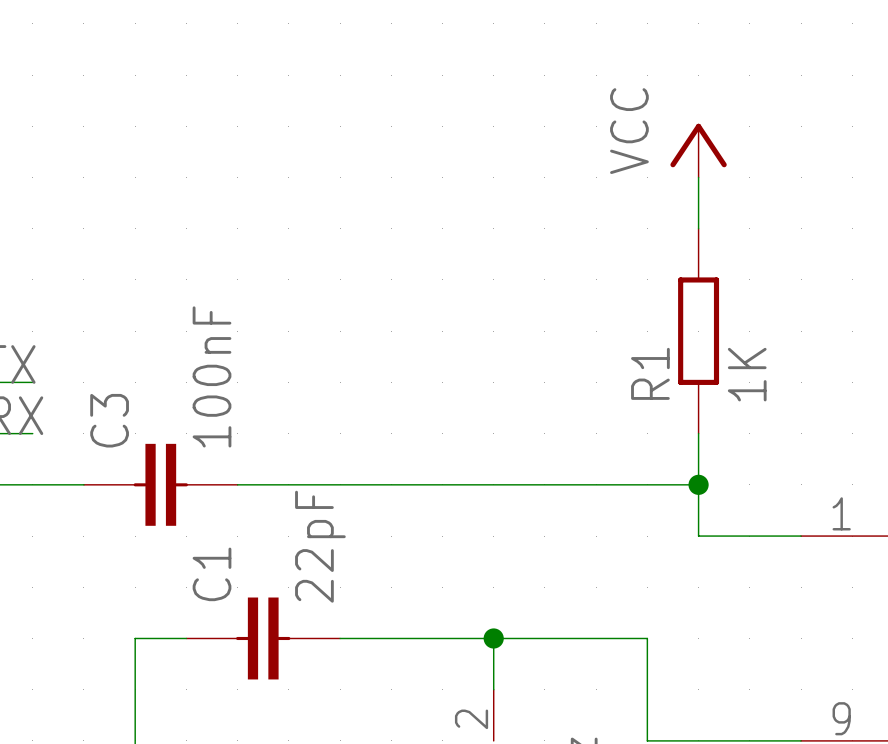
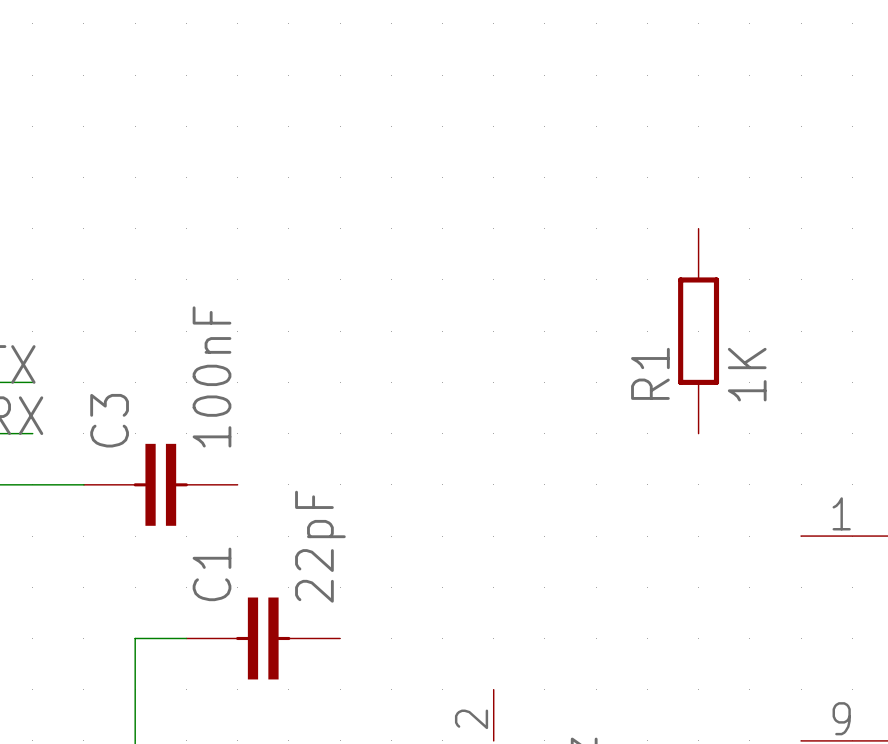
power symbol: VCC (698, 150) -> none
wire: (698, 177) (698, 228) -> none
wire: (698, 433) (698, 536) (801, 536) -> none
wire: (237, 484) (698, 484) -> none
junction: (698, 484) -> none
wire: (340, 638) (647, 638) (647, 740) (801, 740) -> none
wire: (493, 638) (493, 689) -> none
junction: (493, 638) -> none

